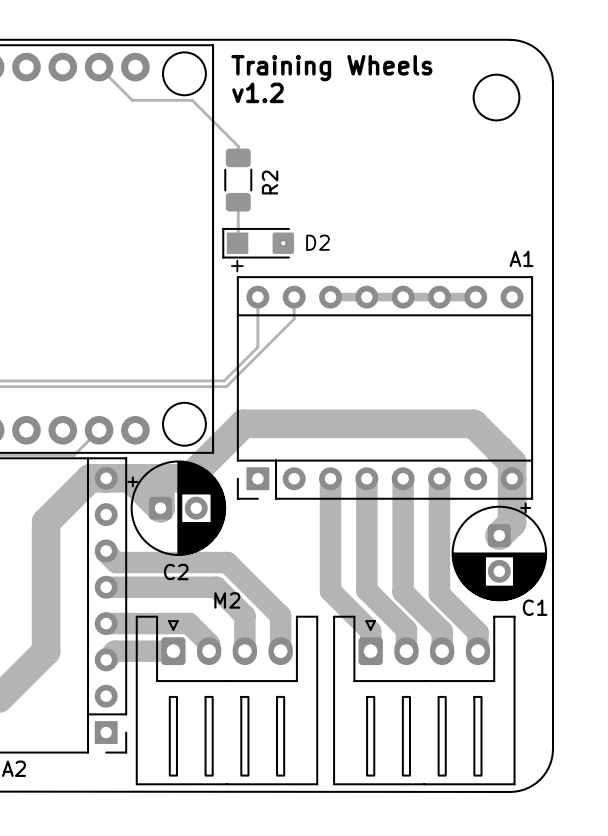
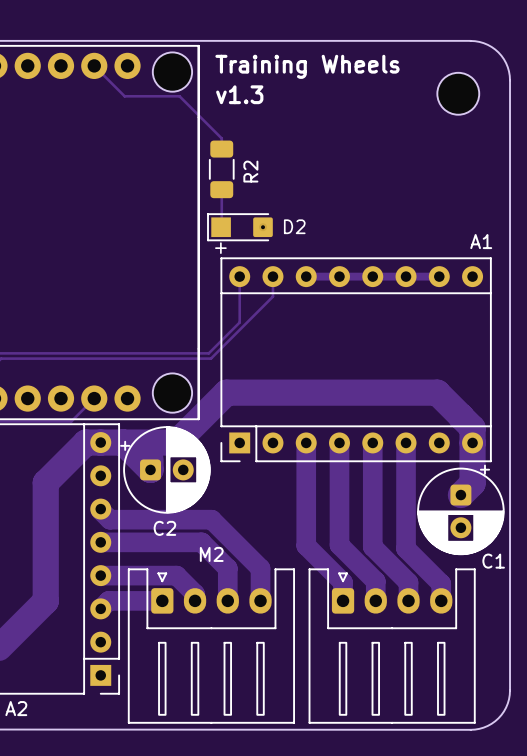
text: v1.2 (257, 92) -> v1.3 (239, 94)

